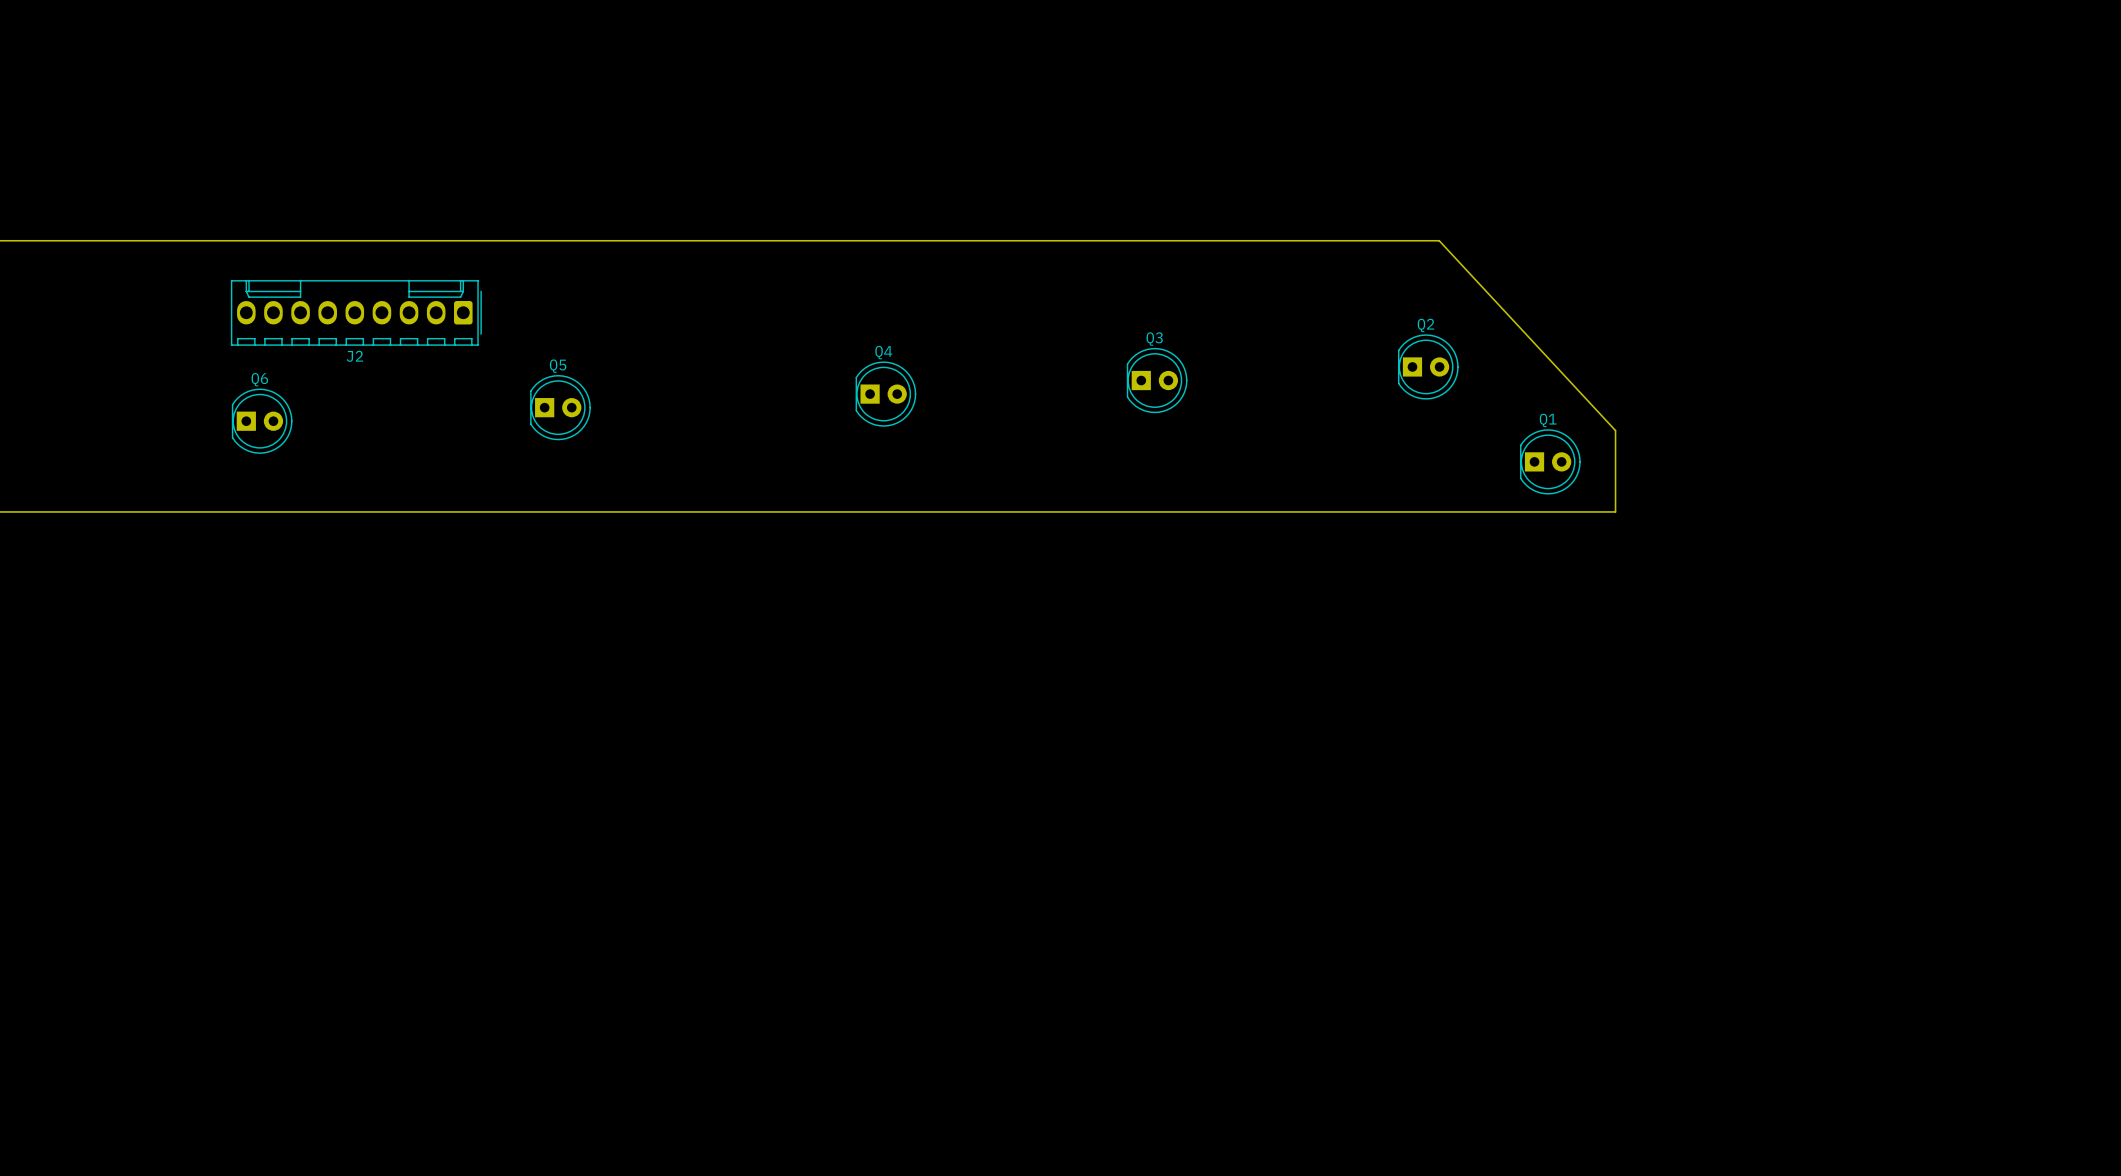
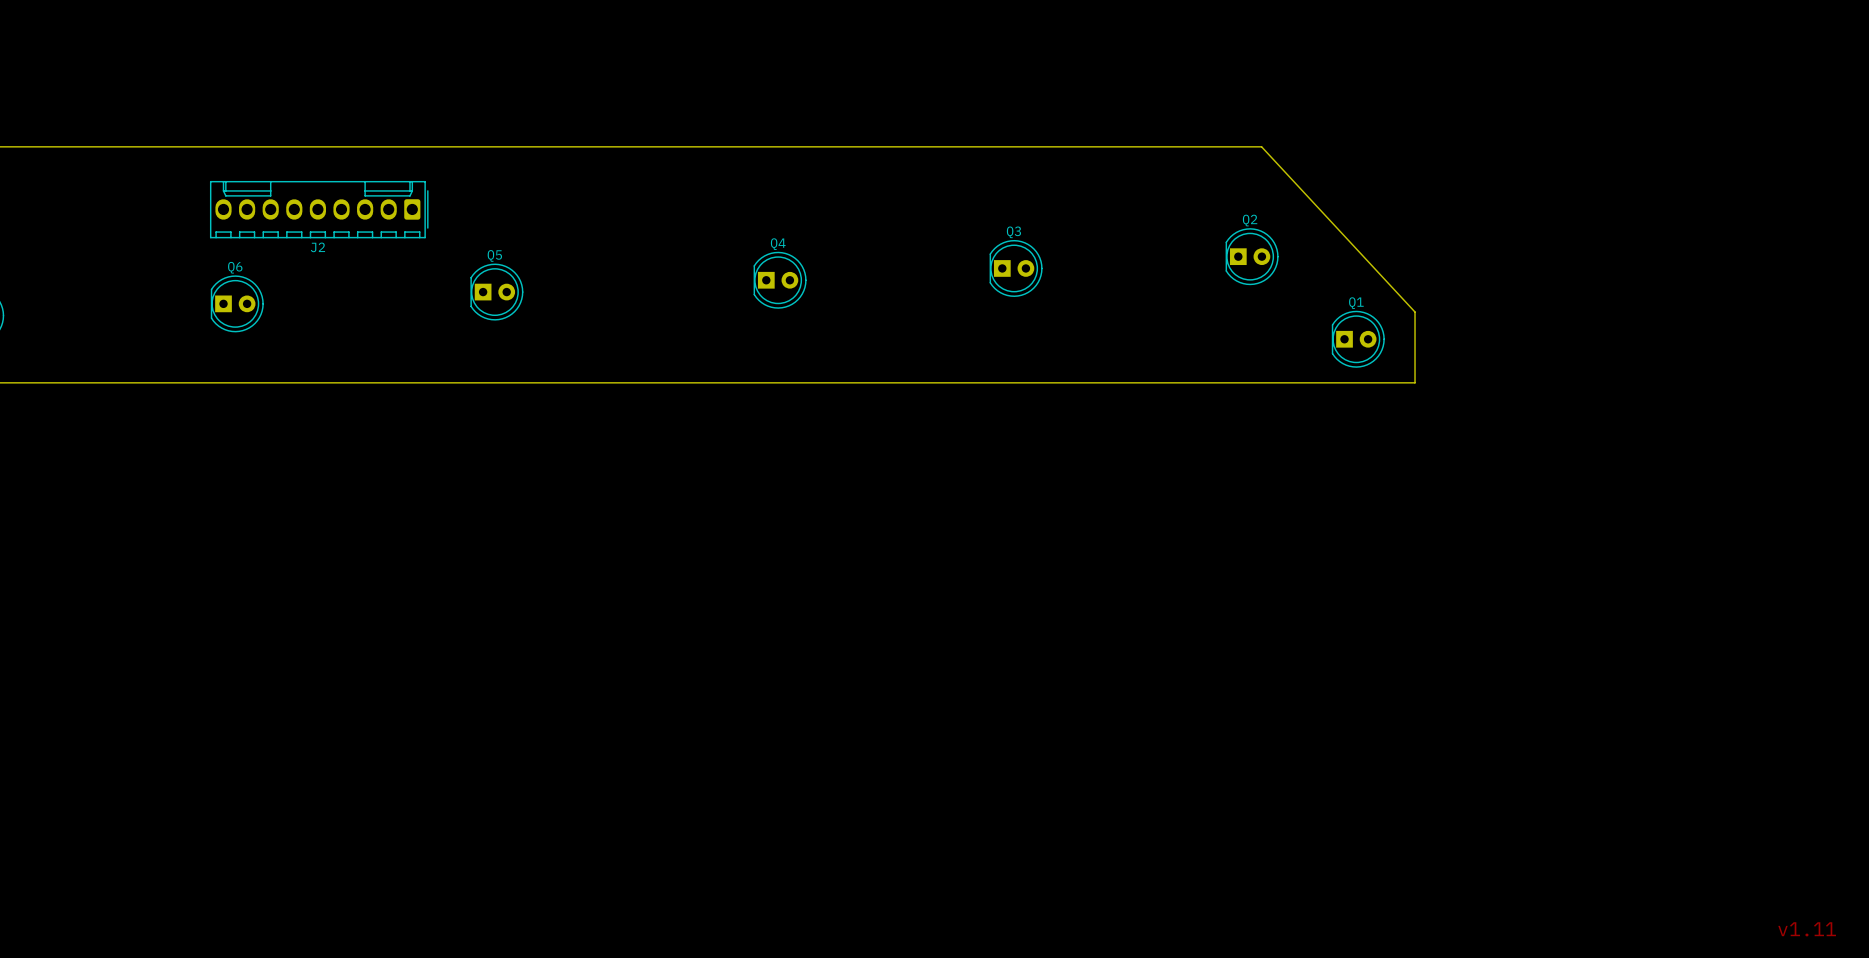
text: none -> v1.11 (1807, 929)

